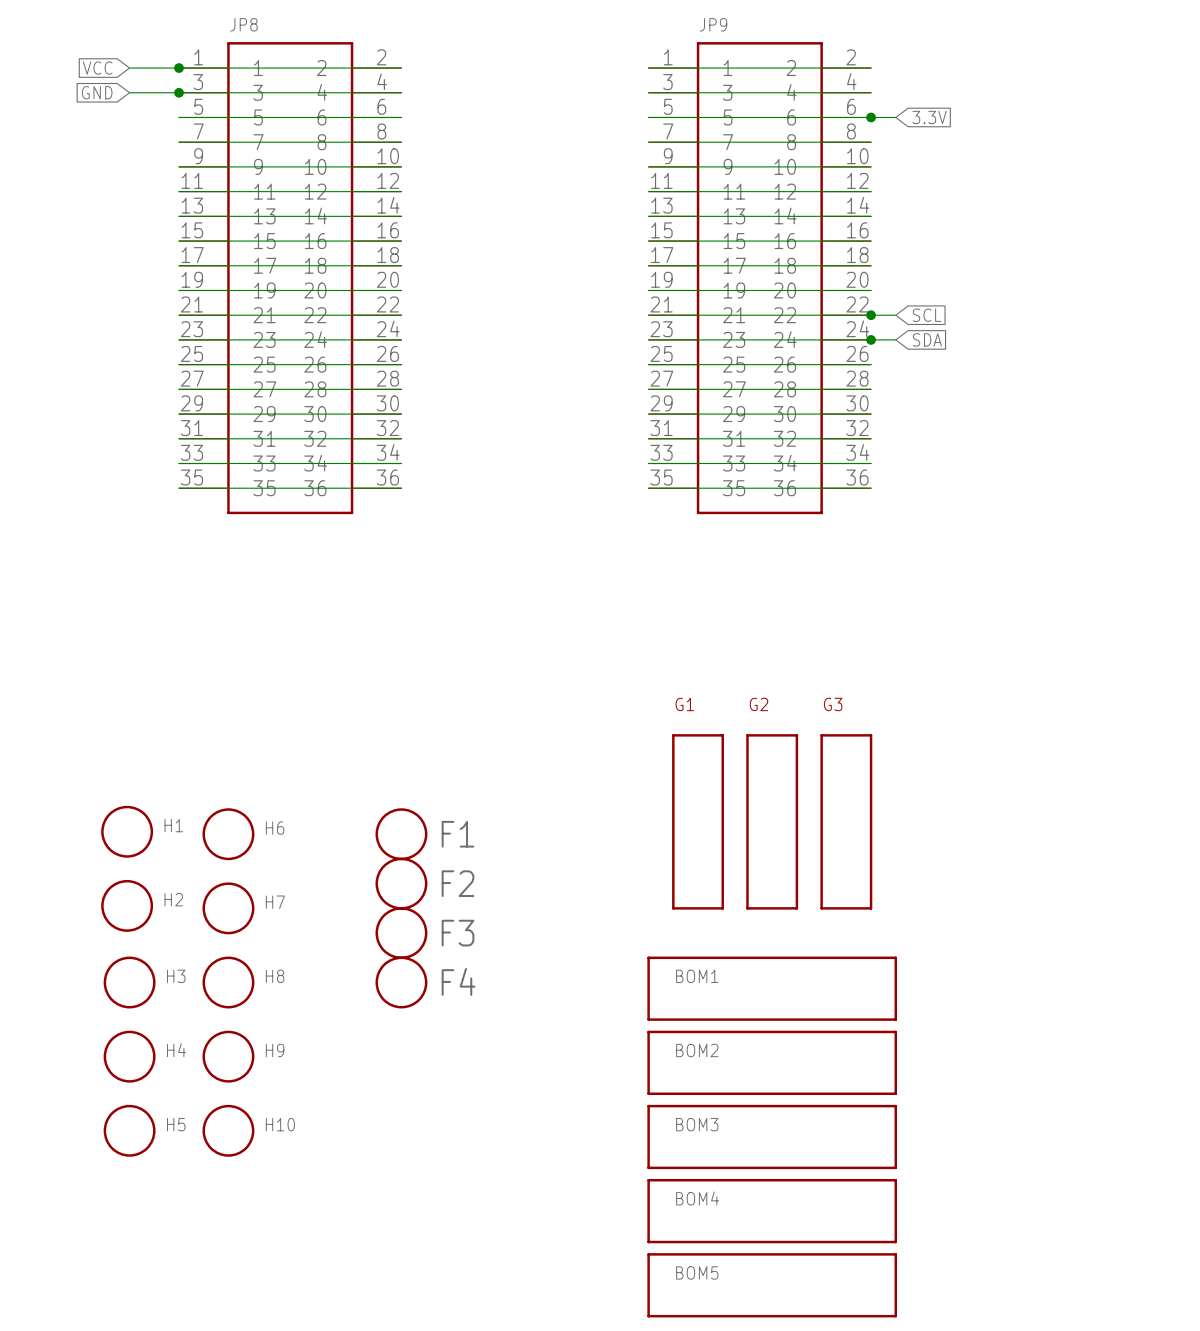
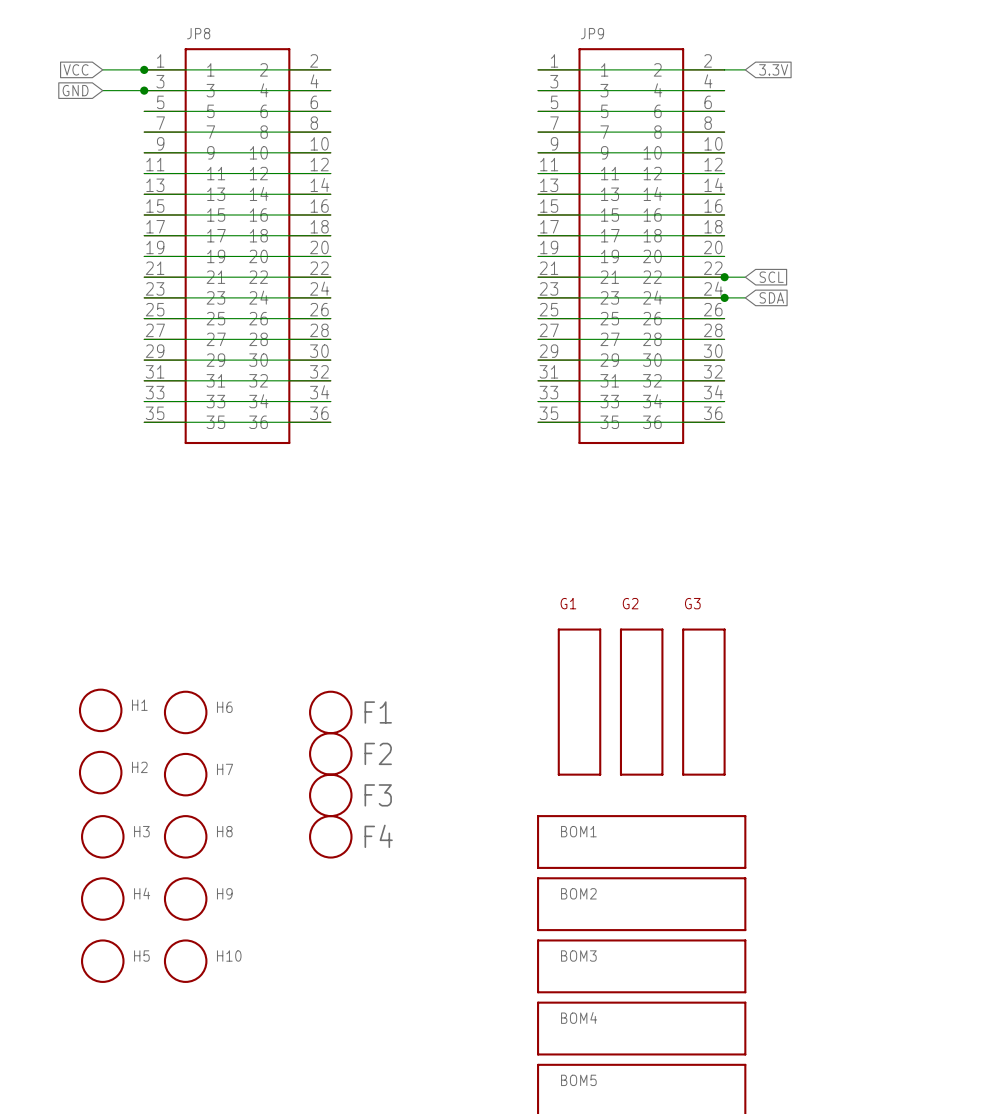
wire: (871, 117) (895, 117) -> (724, 69) (745, 69)
junction: (871, 117) -> none
global label position: 3.3V (929, 117) -> 3.3V (773, 69)

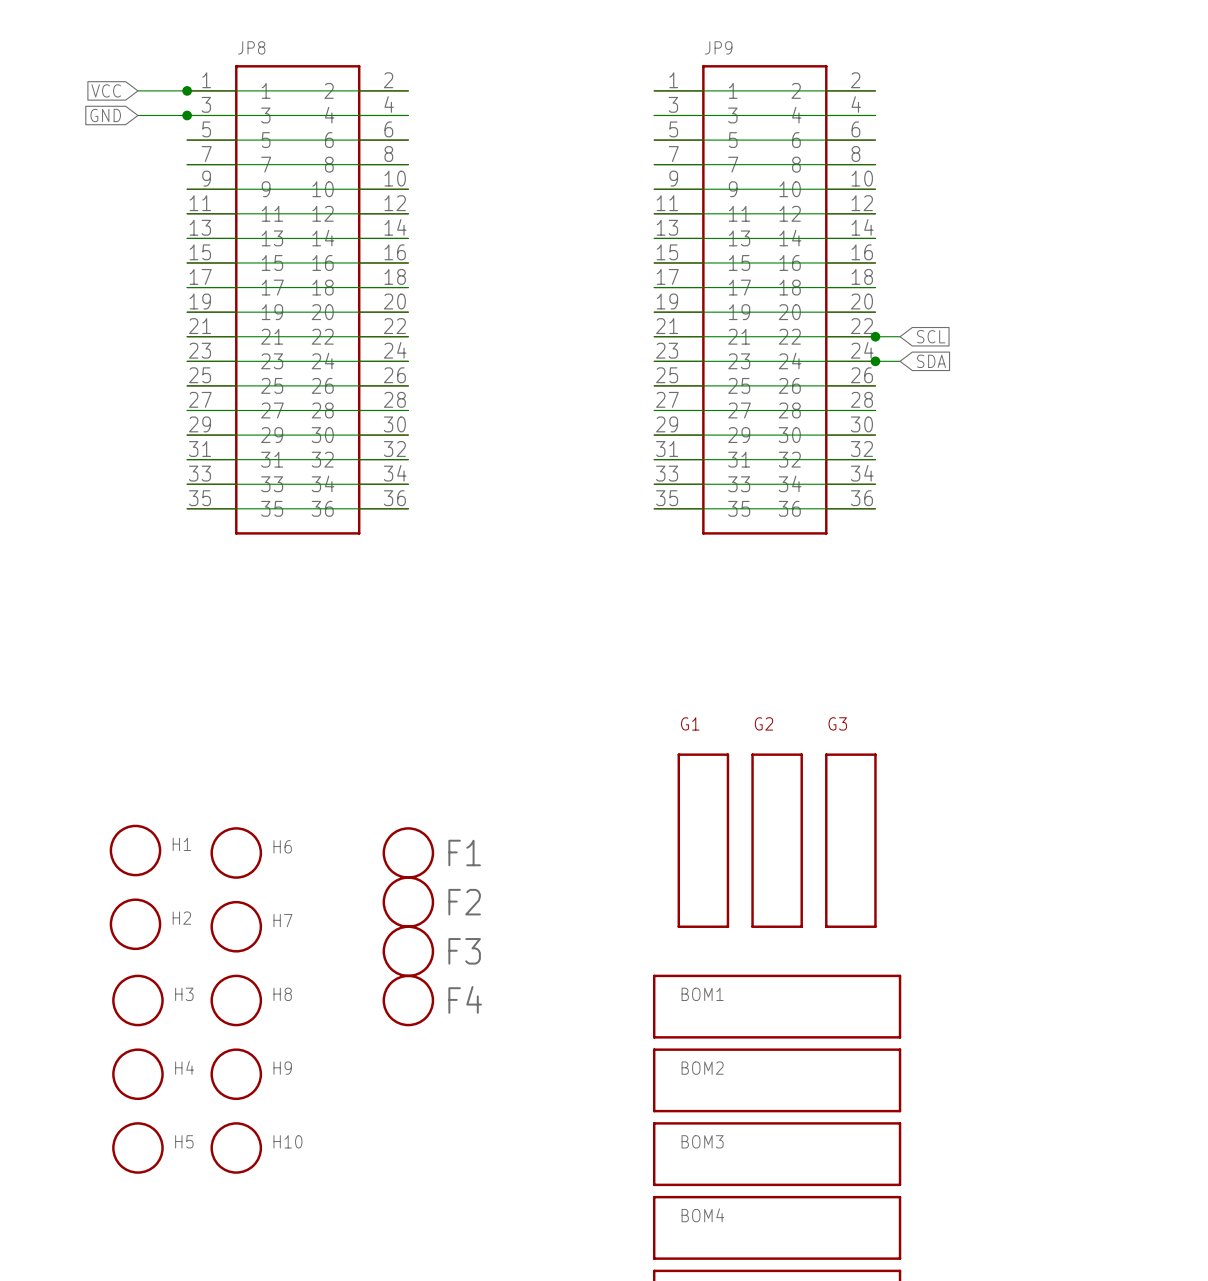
wire: (724, 69) (745, 69) -> none
global label: 3.3V (773, 69) -> none

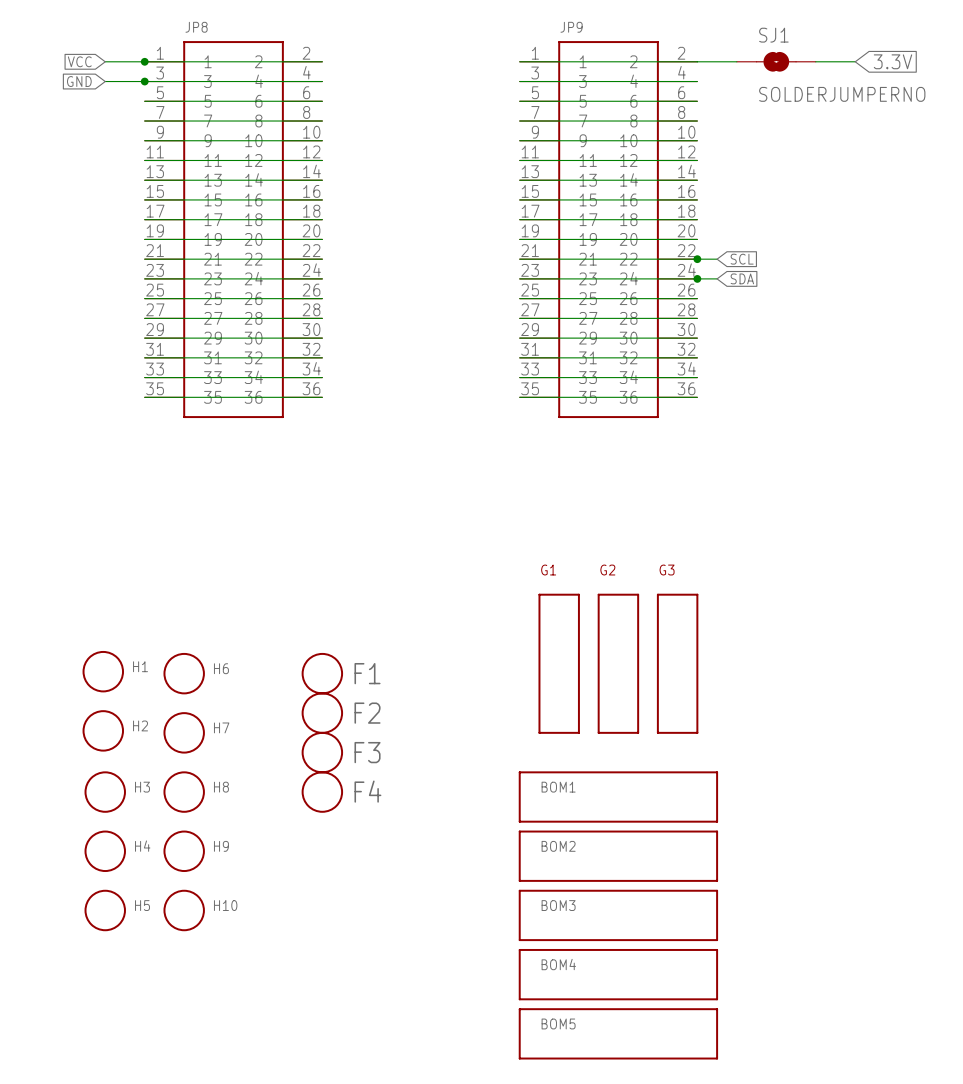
wire: none -> (697, 61) (736, 61)
SJ1: none -> SOLDERJUMPERNO (776, 61)
wire: none -> (815, 61) (855, 61)
global label: none -> 3.3V (892, 61)

